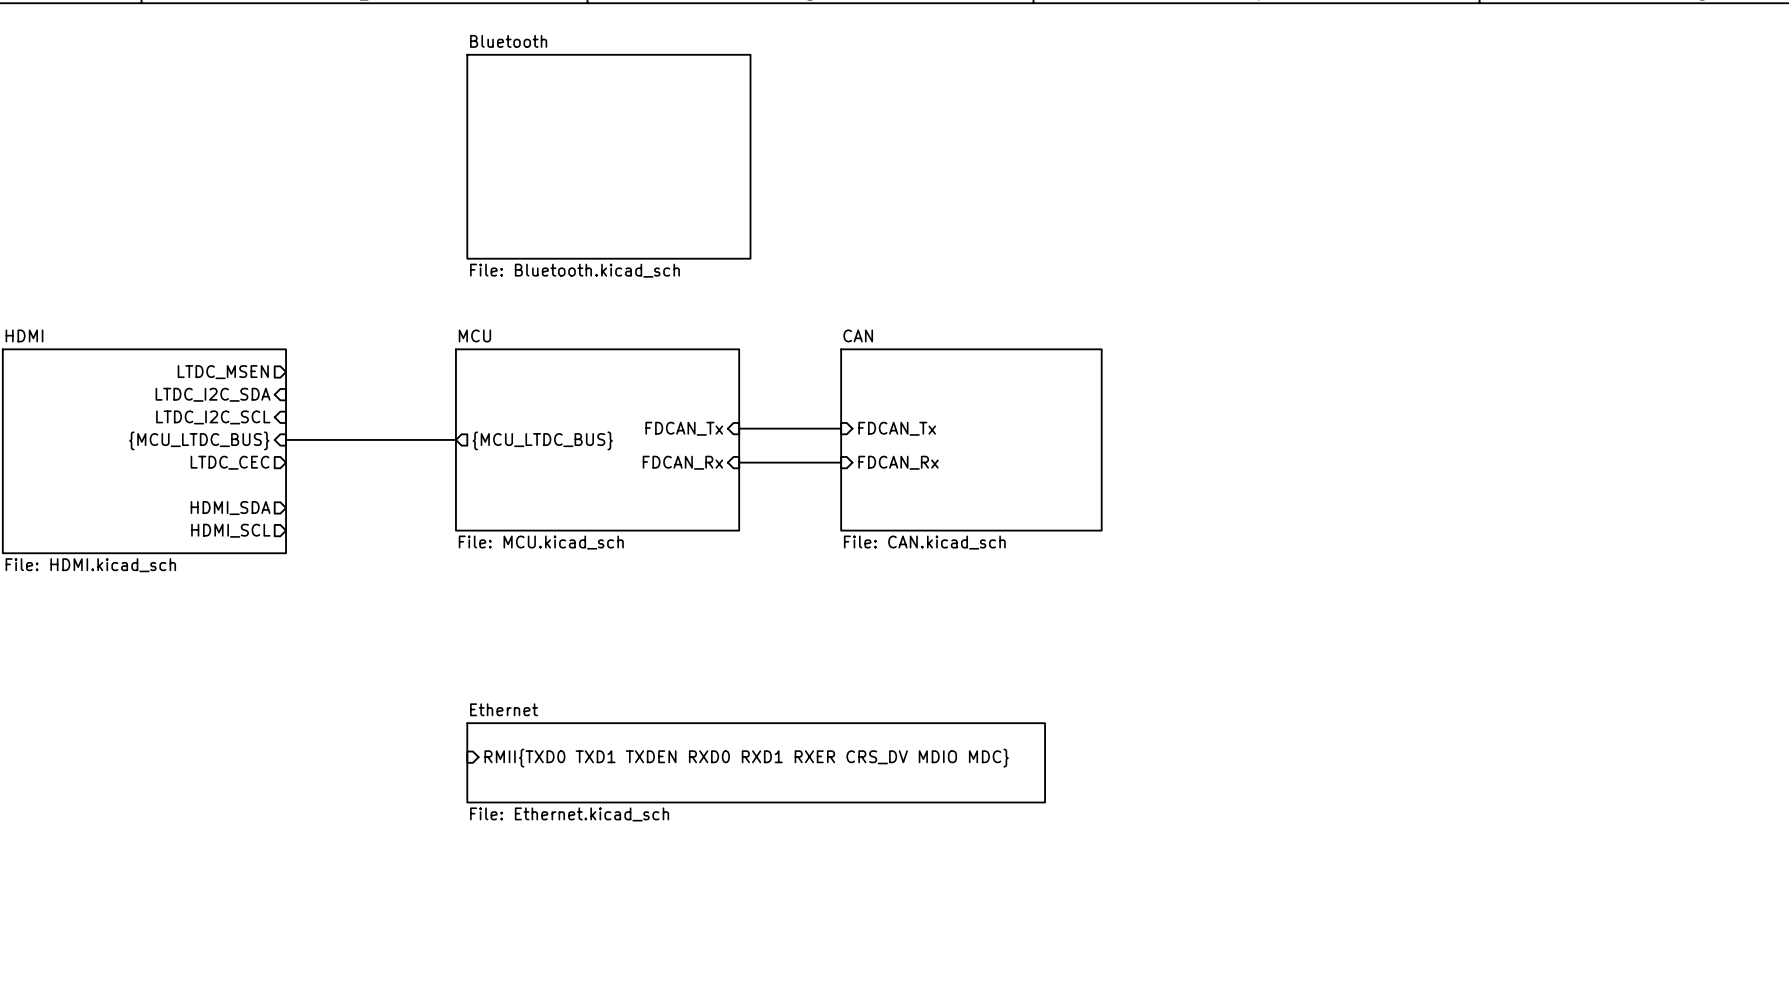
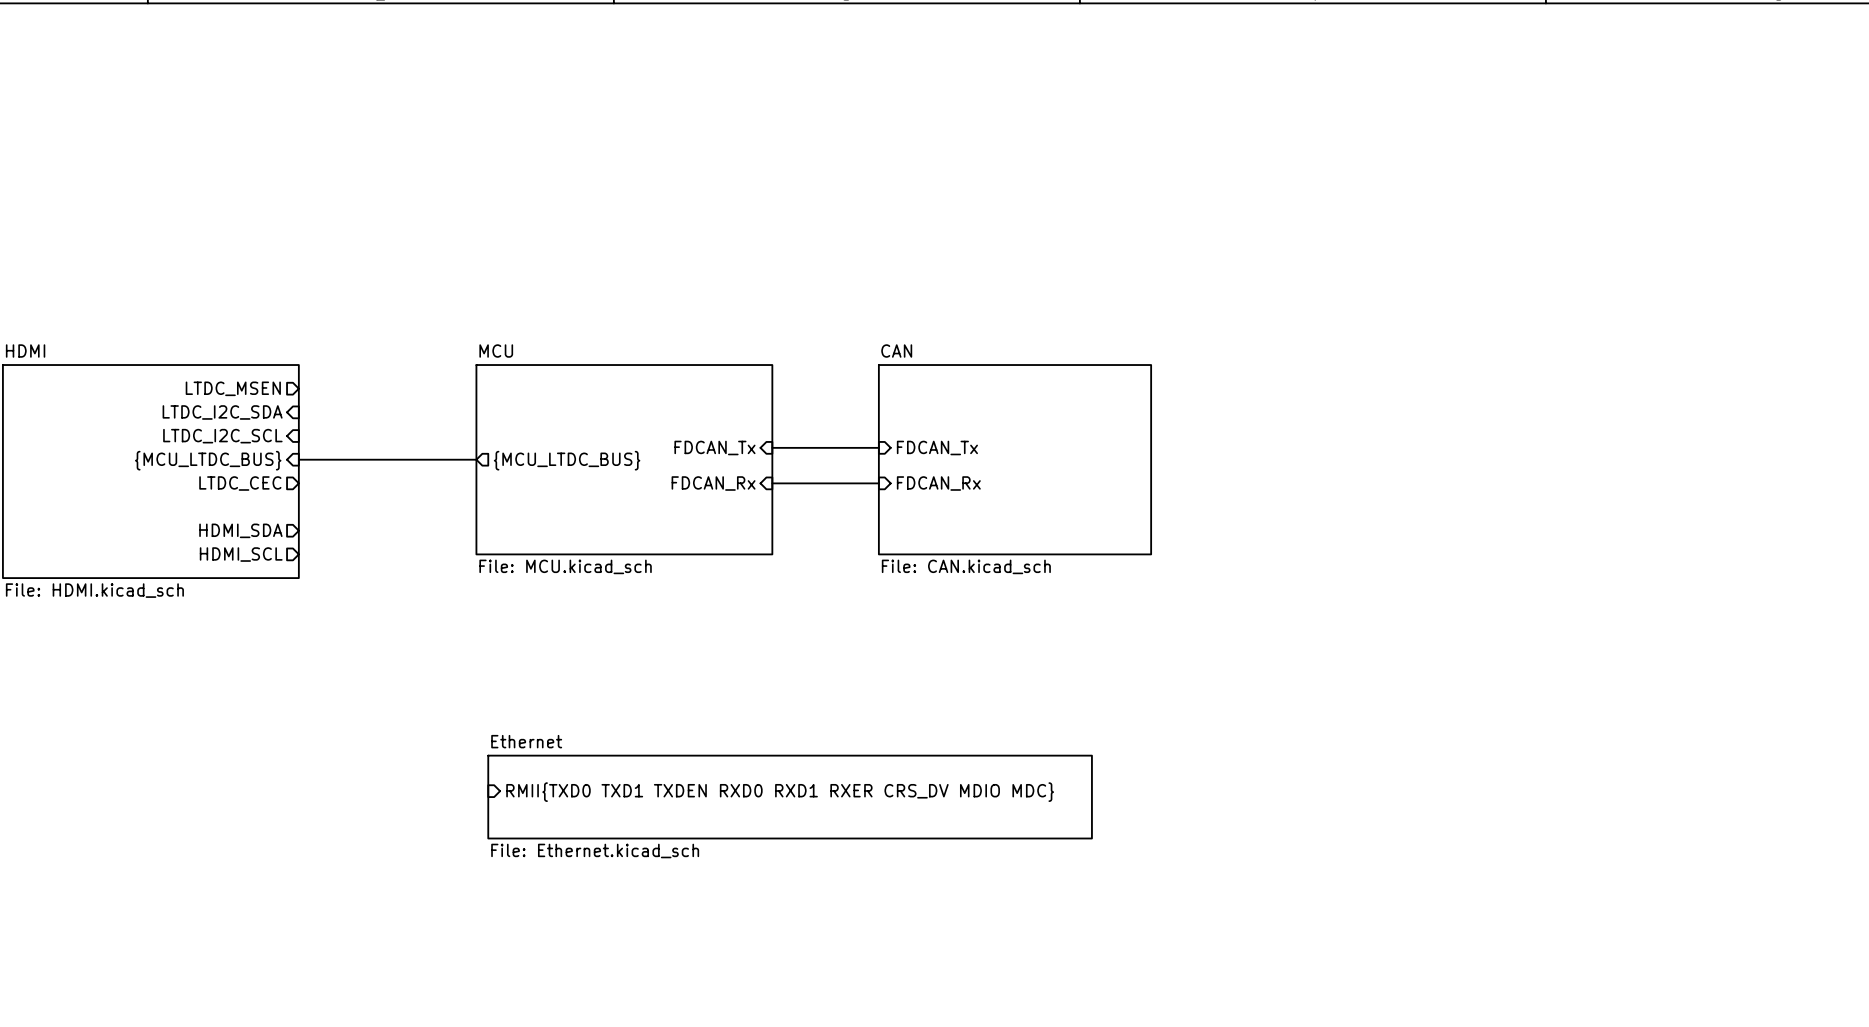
sheet Bluetooth: File: Bluetooth.kicad_sch (608, 156) -> none

